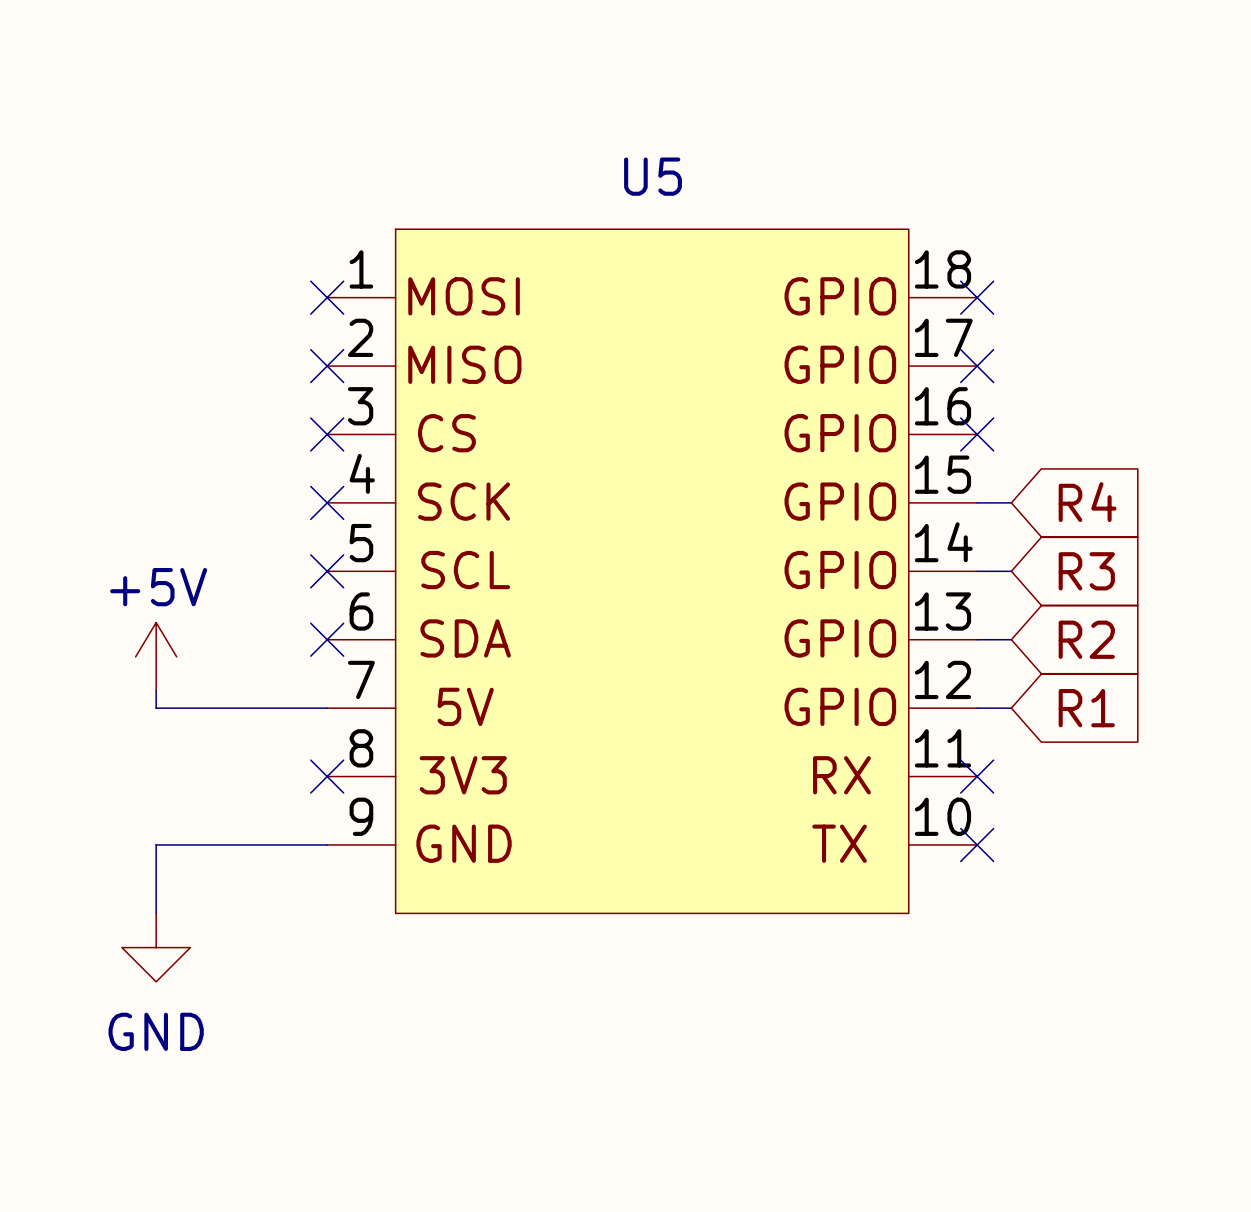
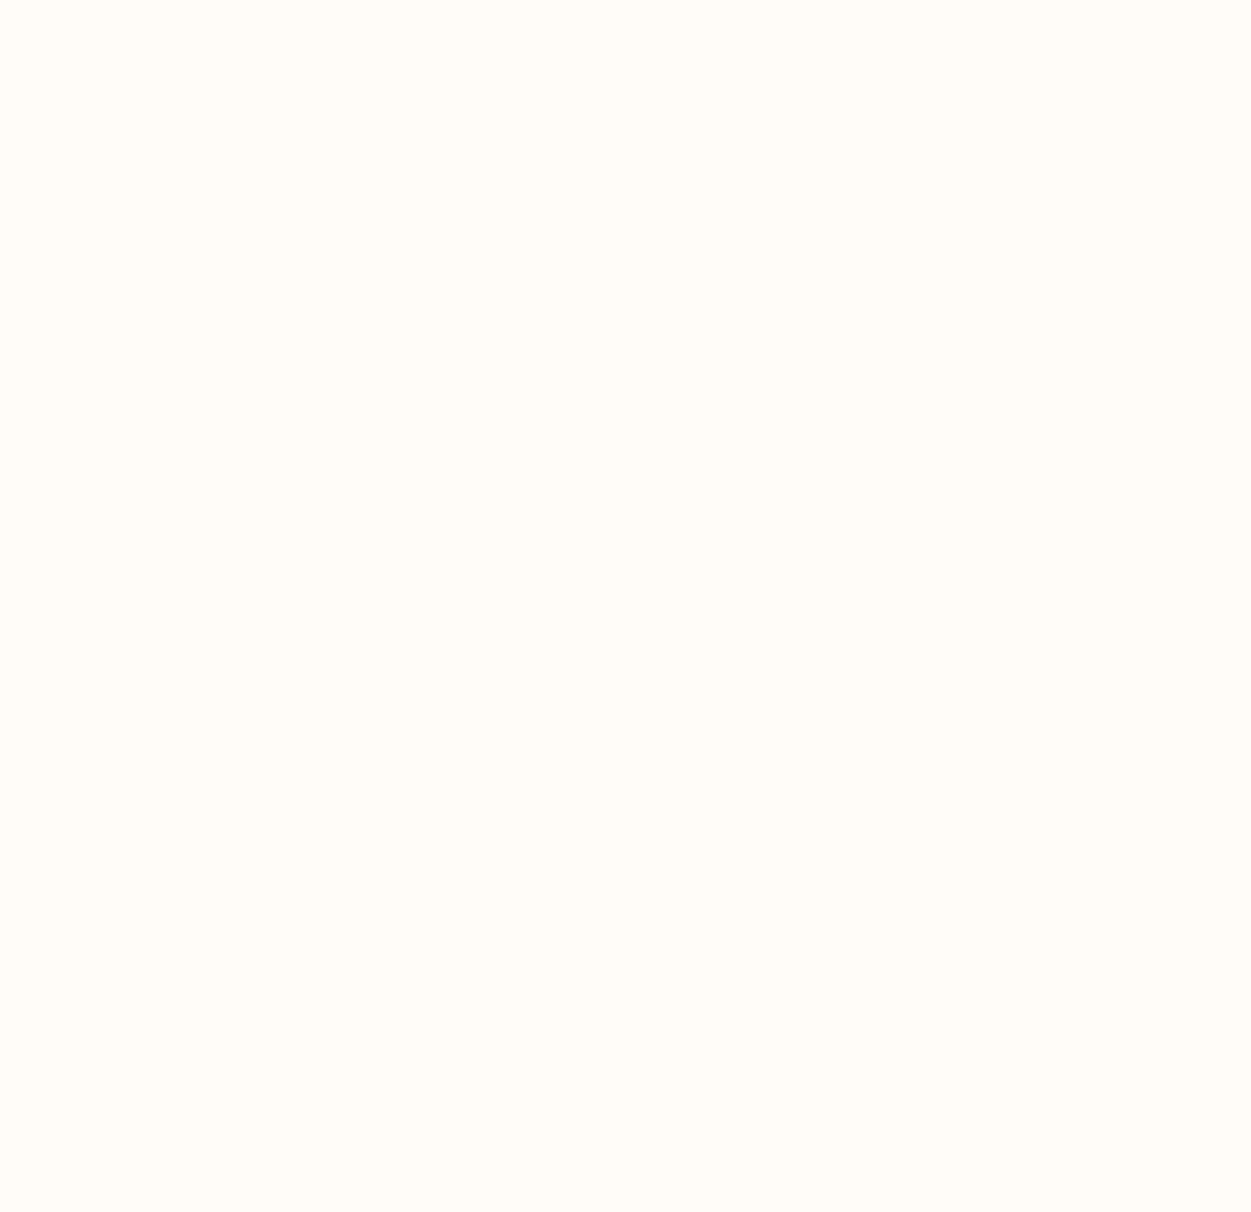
no-connect mark: (327, 297) -> none
no-connect mark: (977, 297) -> none
no-connect mark: (327, 366) -> none
no-connect mark: (977, 366) -> none
no-connect mark: (327, 434) -> none
no-connect mark: (977, 434) -> none
no-connect mark: (327, 502) -> none
wire: (977, 502) (1011, 502) -> none
global label: R4 (1087, 502) -> none
no-connect mark: (327, 571) -> none
U5: (652, 571) -> none
wire: (977, 571) (1011, 571) -> none
global label: R3 (1086, 571) -> none
no-connect mark: (327, 639) -> none
wire: (977, 639) (1011, 639) -> none
global label: R2 (1086, 639) -> none
power symbol: +5V (156, 656) -> none
wire: (156, 691) (156, 708) (327, 708) -> none
wire: (977, 708) (1011, 708) -> none
global label: R1 (1086, 708) -> none
no-connect mark: (327, 776) -> none
no-connect mark: (977, 776) -> none
wire: (327, 844) (156, 844) (156, 913) -> none
no-connect mark: (977, 844) -> none
power symbol: GND (156, 947) -> none

